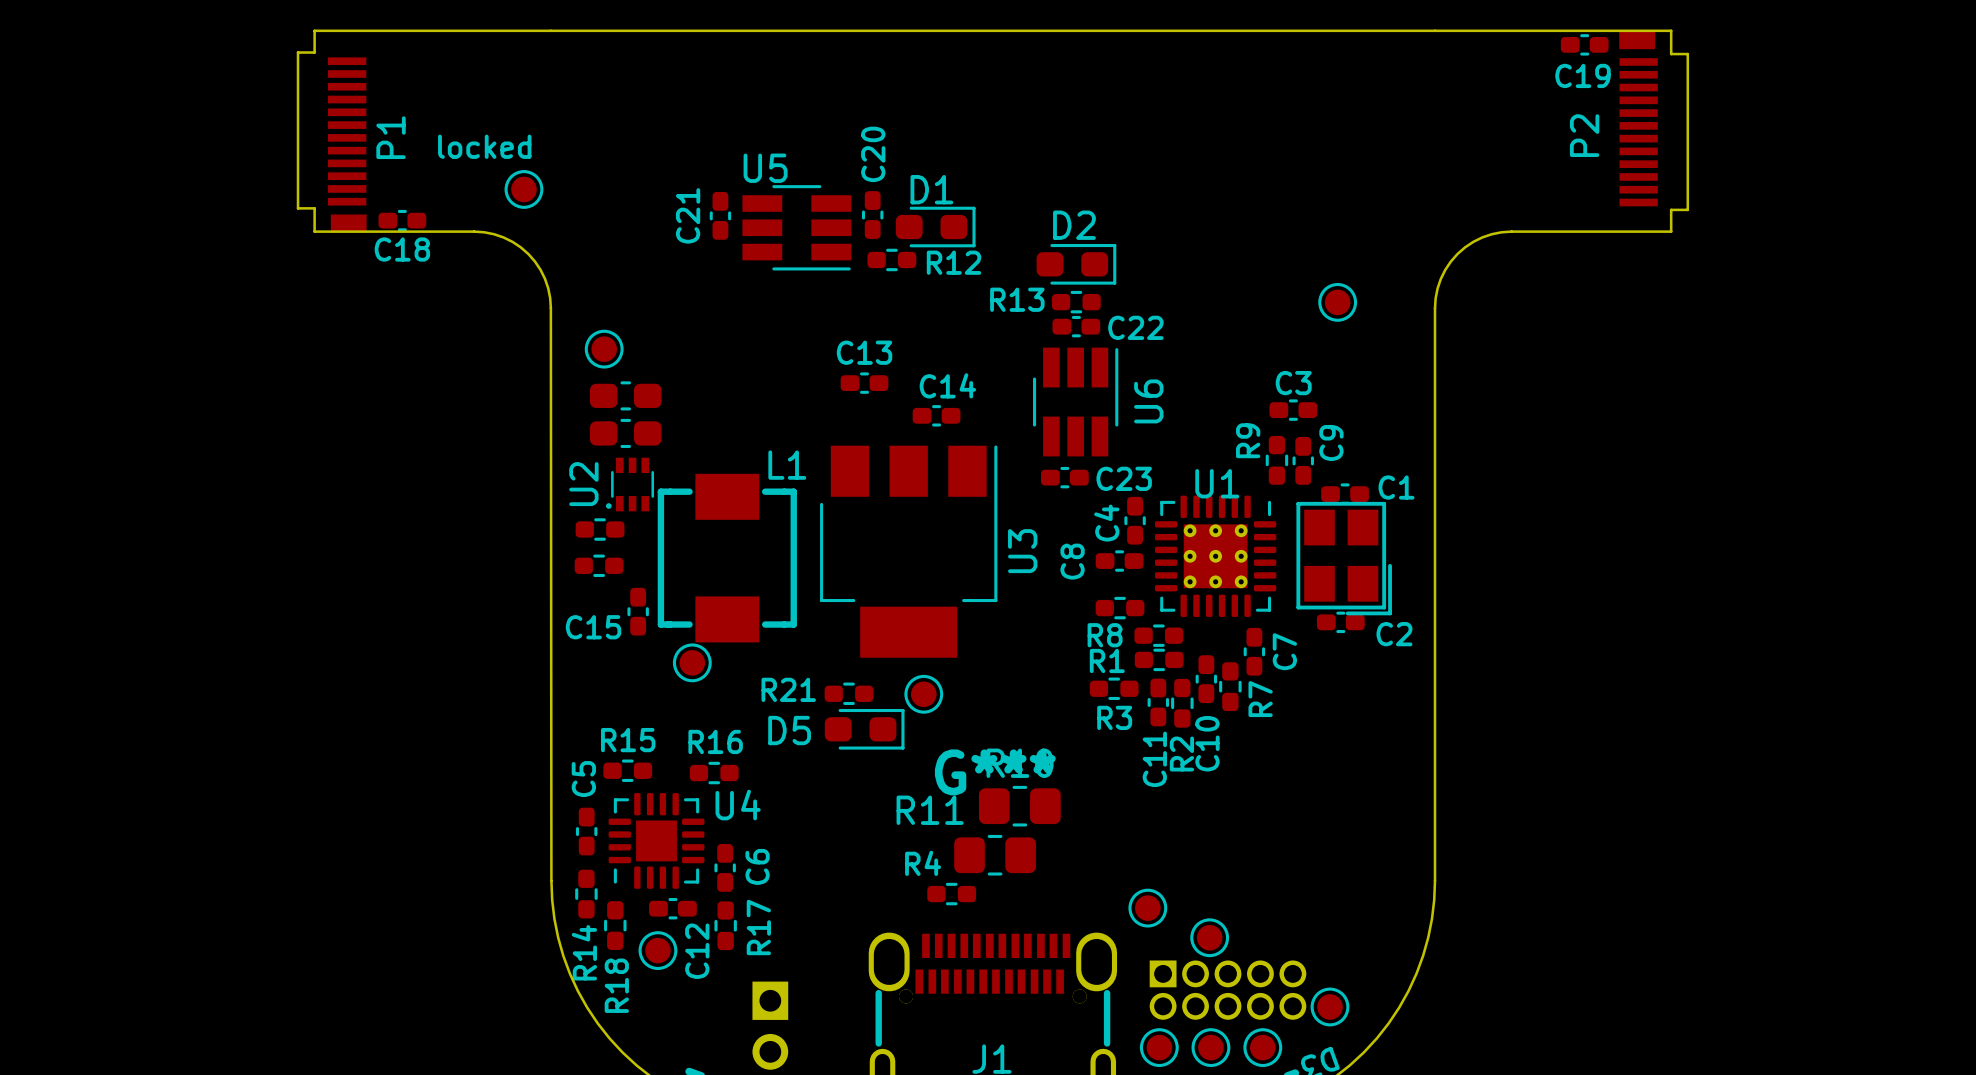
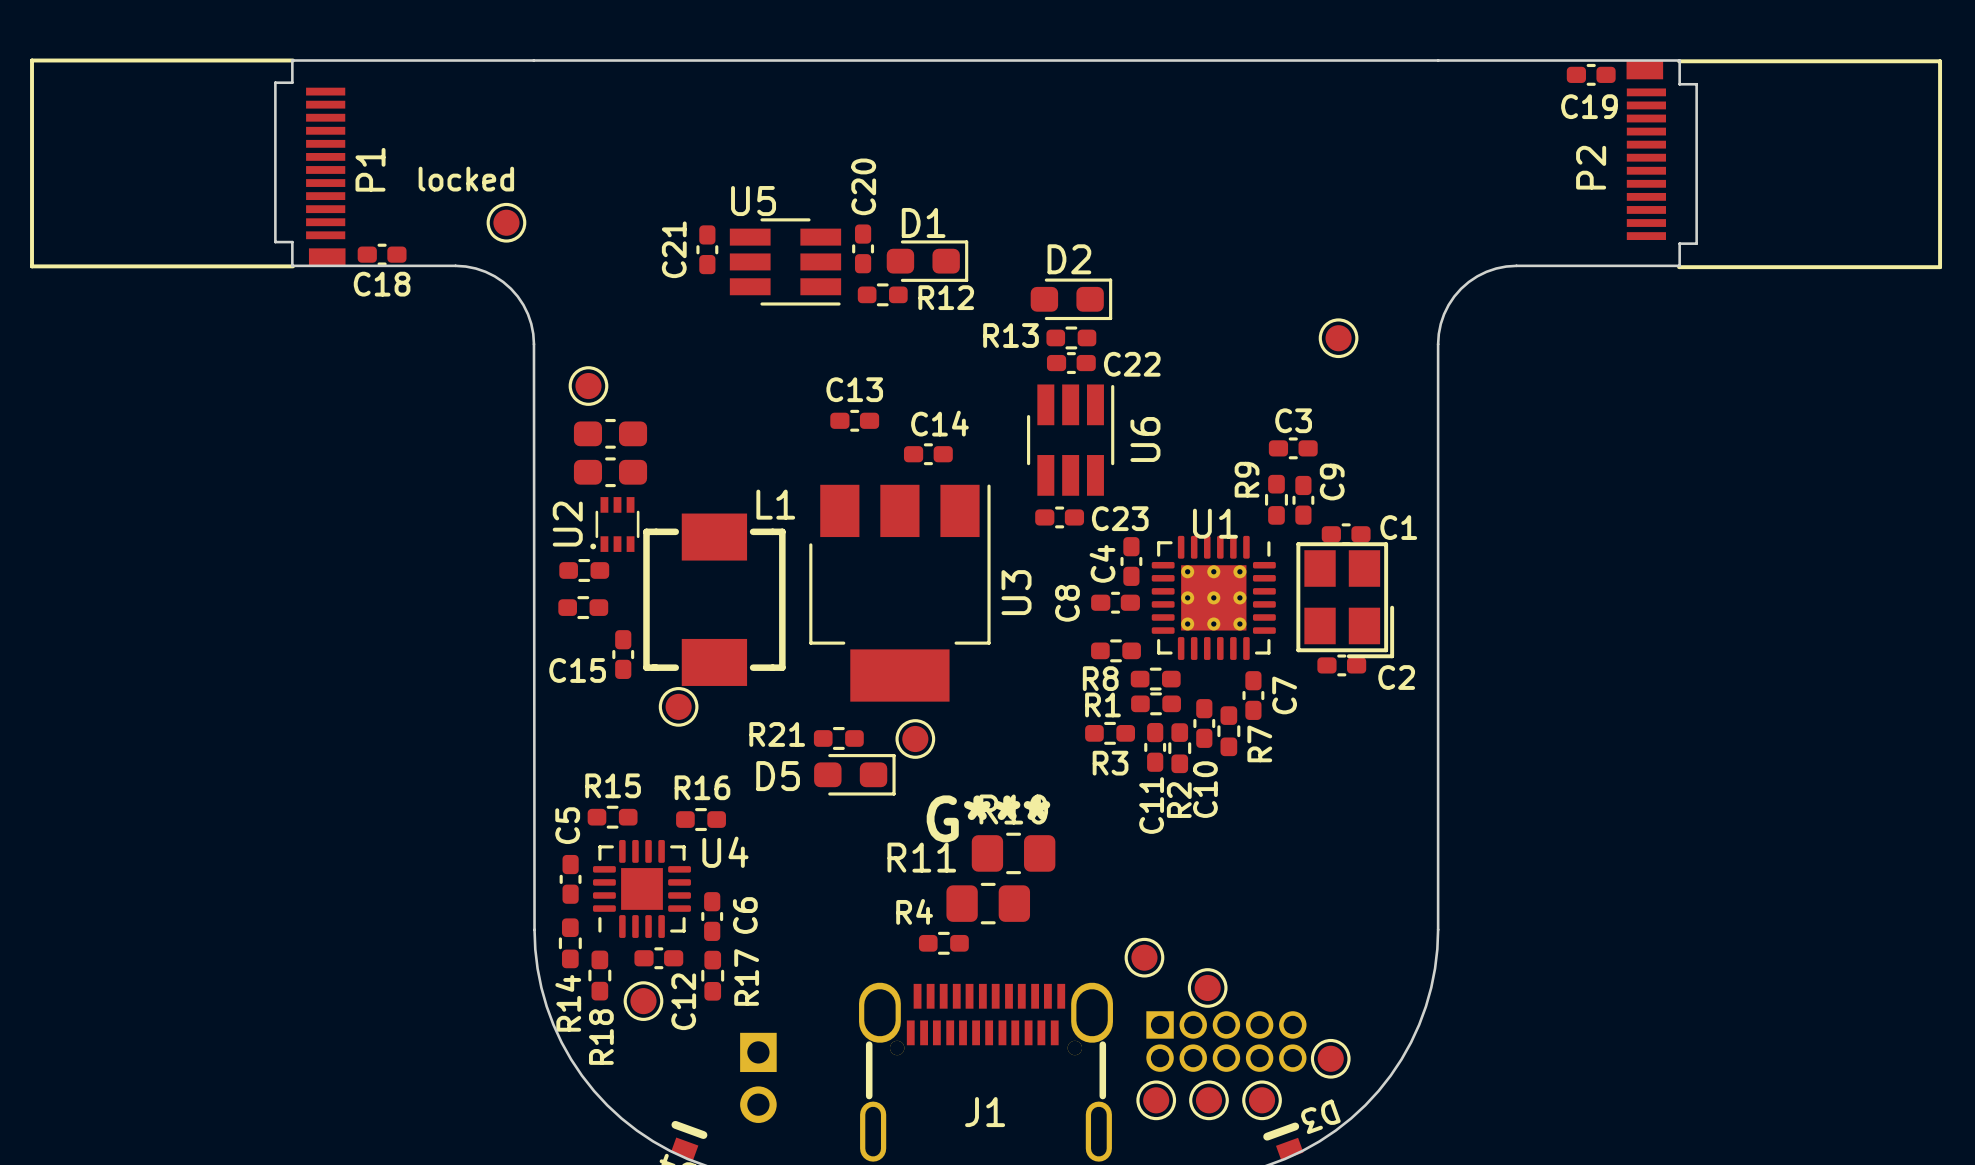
P2 footprint: [1619, 31, 1658, 207] -> [1626, 59, 1943, 270]
P1 footprint: [328, 57, 367, 233] -> [30, 58, 346, 269]

